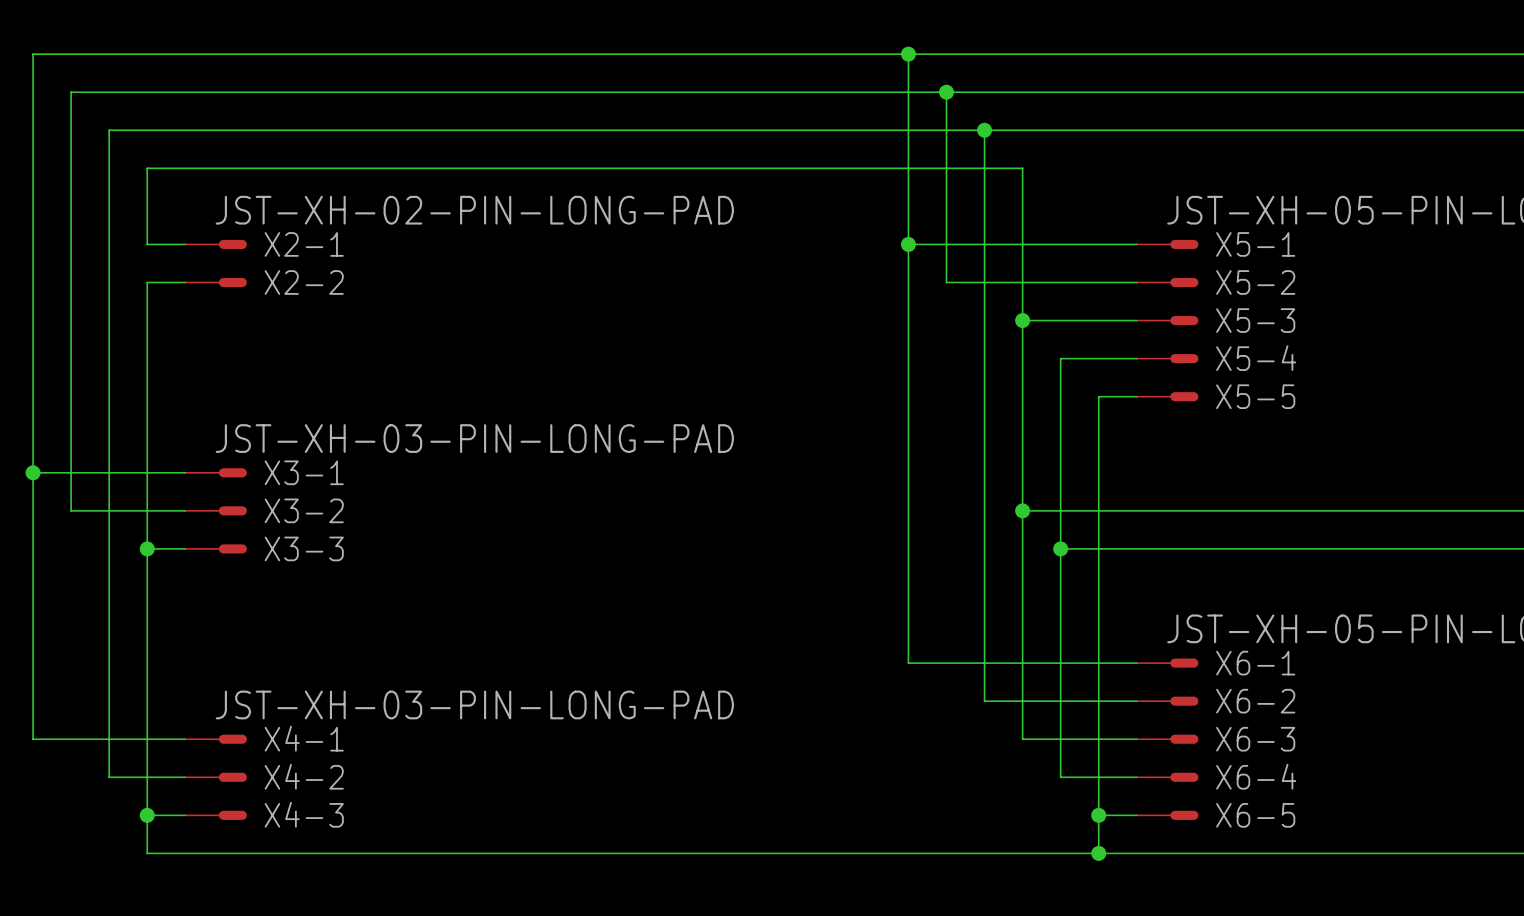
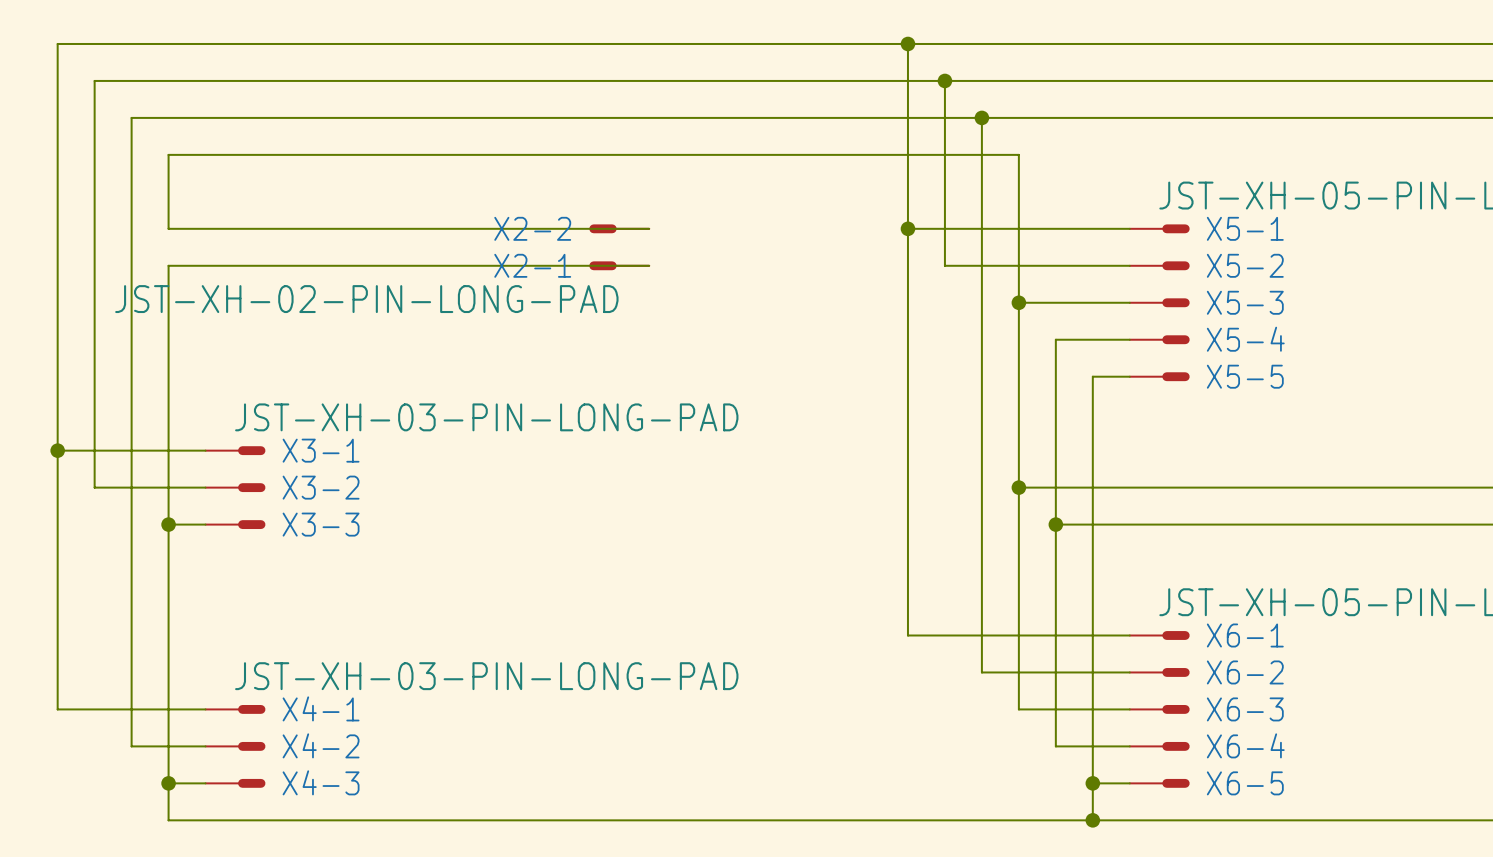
wire: none -> (205, 228) (649, 228)
X2-1 position: (216, 244) -> (619, 265)
X2-1 rotation: 0° (232, 244) -> 180° (602, 265)
wire: none -> (205, 265) (649, 265)
X2-2 position: (216, 282) -> (619, 228)
X2-2 rotation: 0° (232, 282) -> 180° (602, 228)

